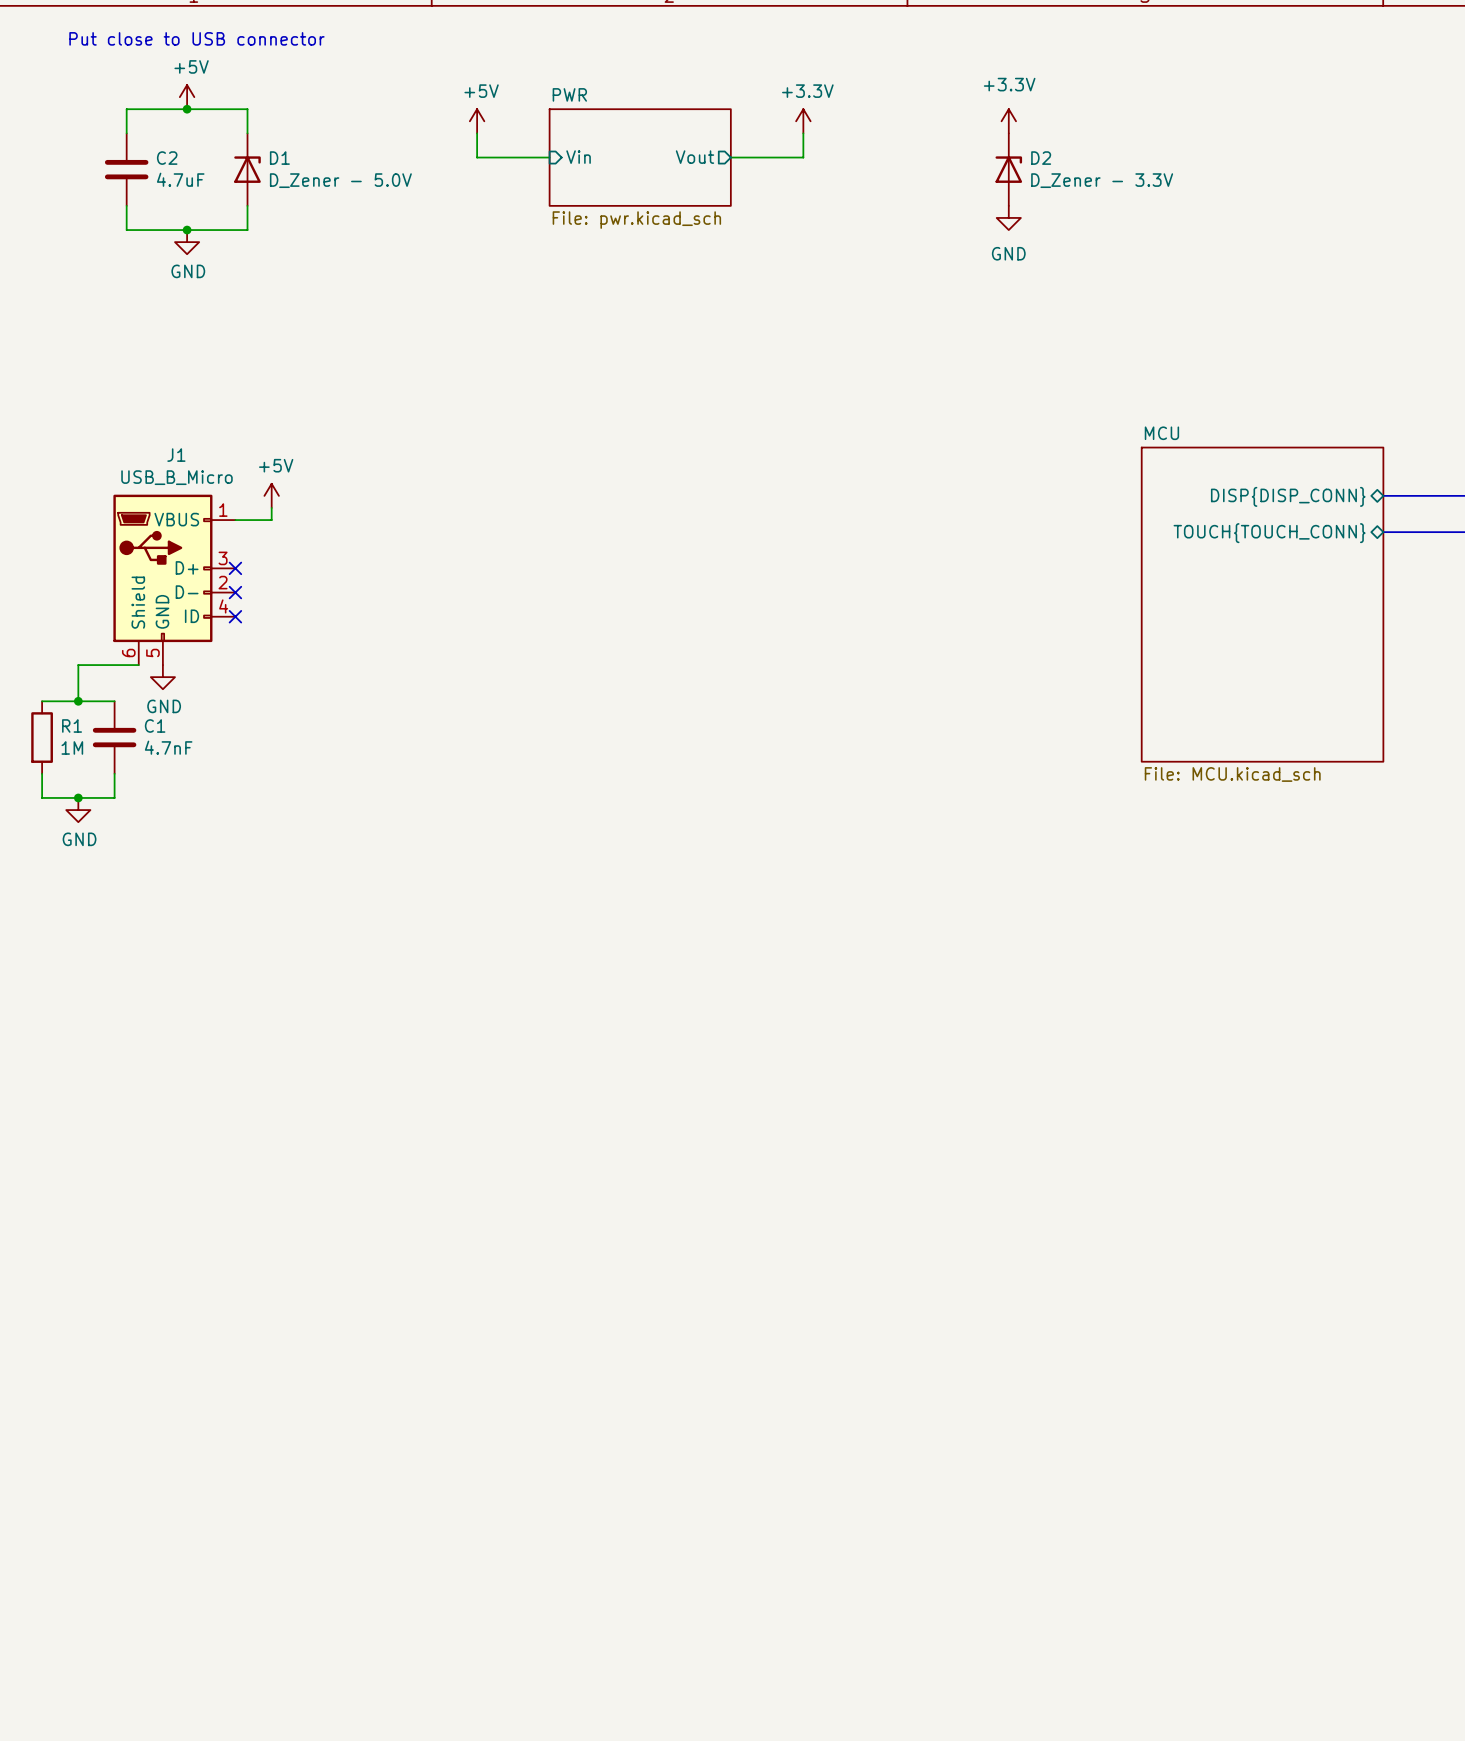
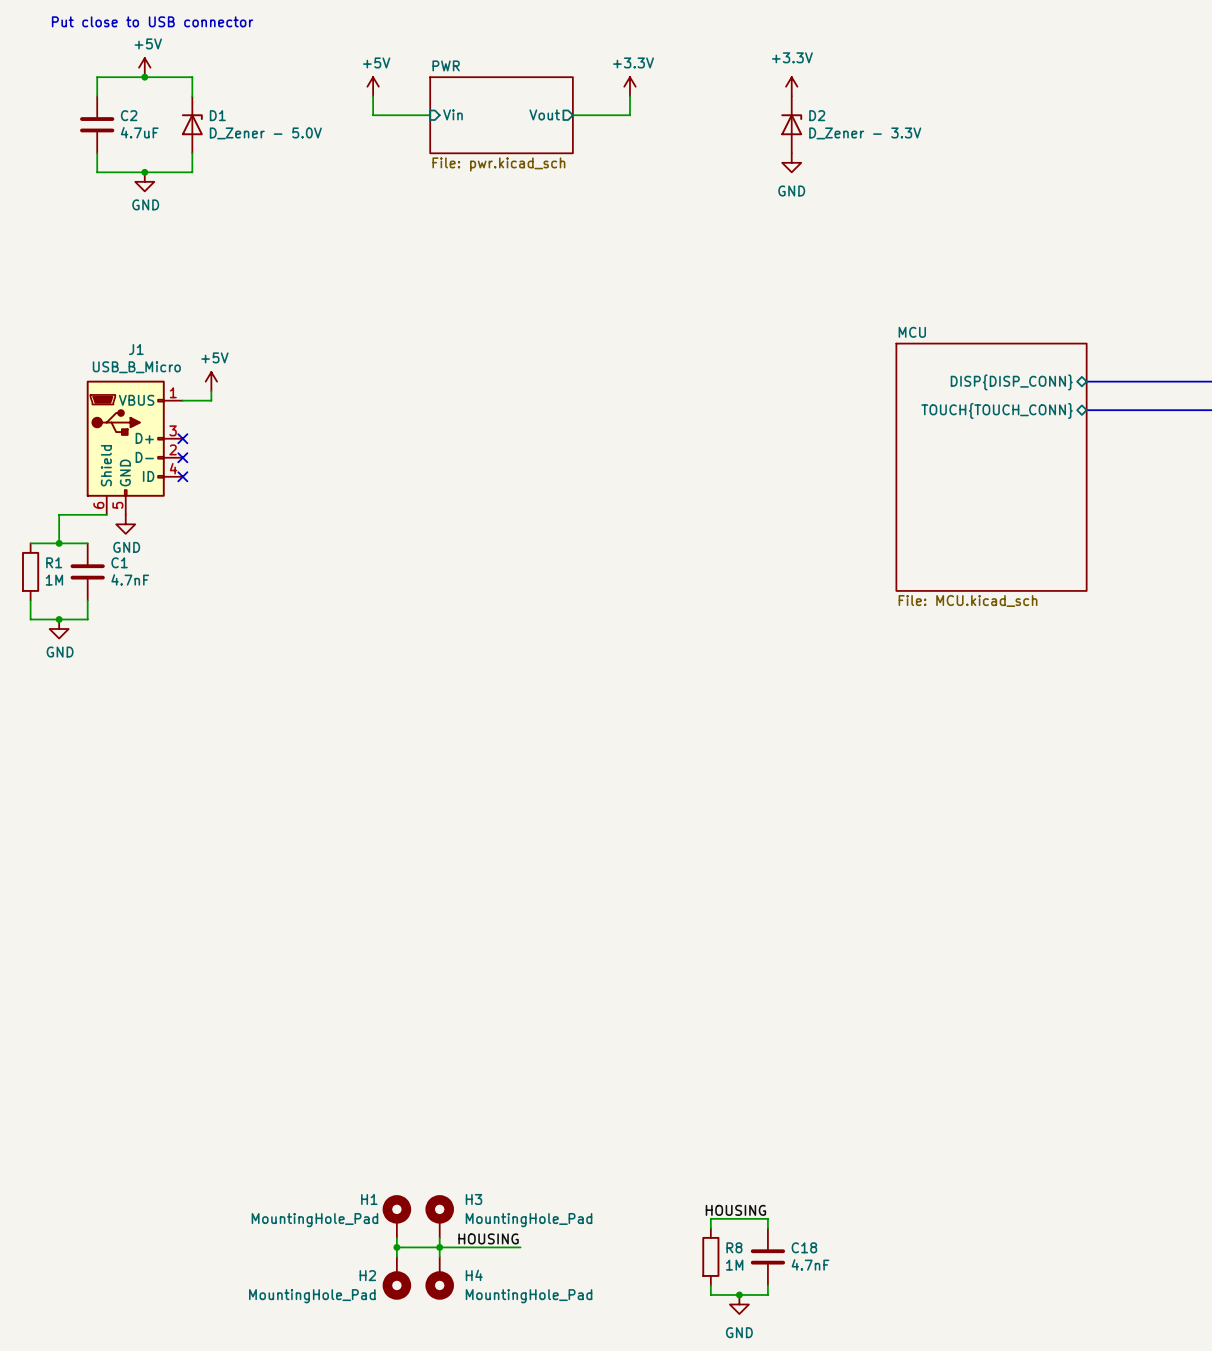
label: none -> HOUSING (735, 1210)
H1: none -> MountingHole_Pad (396, 1216)
H3: none -> MountingHole_Pad (439, 1216)
wire: none -> (710, 1228) (710, 1218) (767, 1218) (767, 1228)
wire: none -> (396, 1237) (396, 1256)
wire: none -> (439, 1237) (439, 1256)
label: none -> HOUSING (488, 1238)
wire: none -> (396, 1247) (520, 1247)
junction: none -> (396, 1247)
junction: none -> (439, 1247)
R8: none -> 1M (710, 1256)
C18: none -> 4.7nF (767, 1256)
H2: none -> MountingHole_Pad (396, 1278)
H4: none -> MountingHole_Pad (439, 1278)
wire: none -> (710, 1285) (710, 1294) (767, 1294) (767, 1285)
junction: none -> (739, 1294)
power symbol: none -> GND (739, 1304)

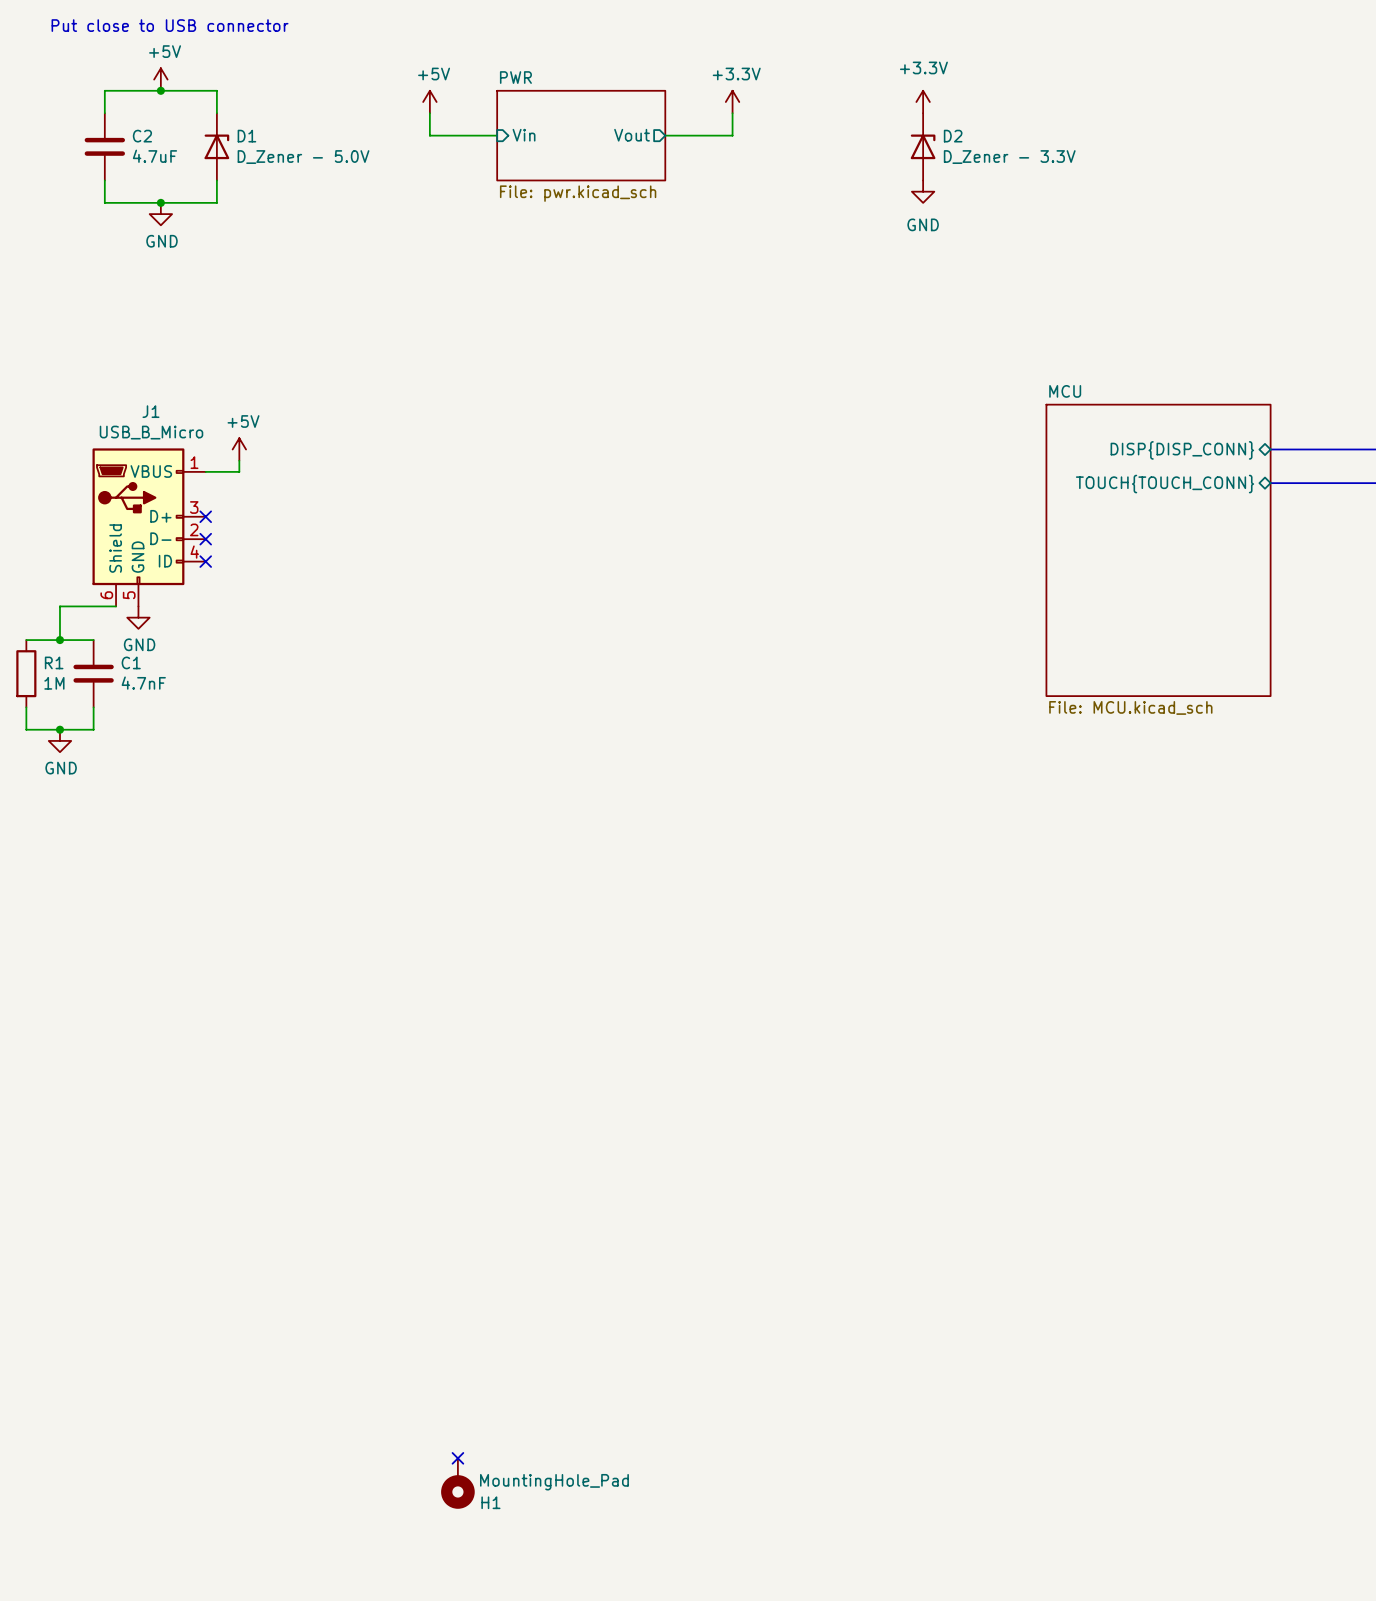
H1 rotation: 0° (396, 1209) -> 180° (457, 1491)
label: HOUSING (735, 1210) -> none
H1 position: (396, 1216) -> (457, 1483)
H3: MountingHole_Pad (439, 1216) -> none
wire: (710, 1228) (710, 1218) (767, 1218) (767, 1228) -> none
no-connect mark: none -> (457, 1458)
wire: (439, 1237) (439, 1256) -> none
label: HOUSING (488, 1238) -> none
wire: (396, 1247) (520, 1247) -> none
junction: (396, 1247) -> none
junction: (439, 1247) -> none
R8: 1M (710, 1256) -> none
C18: 4.7nF (767, 1256) -> none
H2: MountingHole_Pad (396, 1278) -> none
H4: MountingHole_Pad (439, 1278) -> none
wire: (710, 1285) (710, 1294) (767, 1294) (767, 1285) -> none
junction: (739, 1294) -> none
power symbol: GND (739, 1304) -> none

